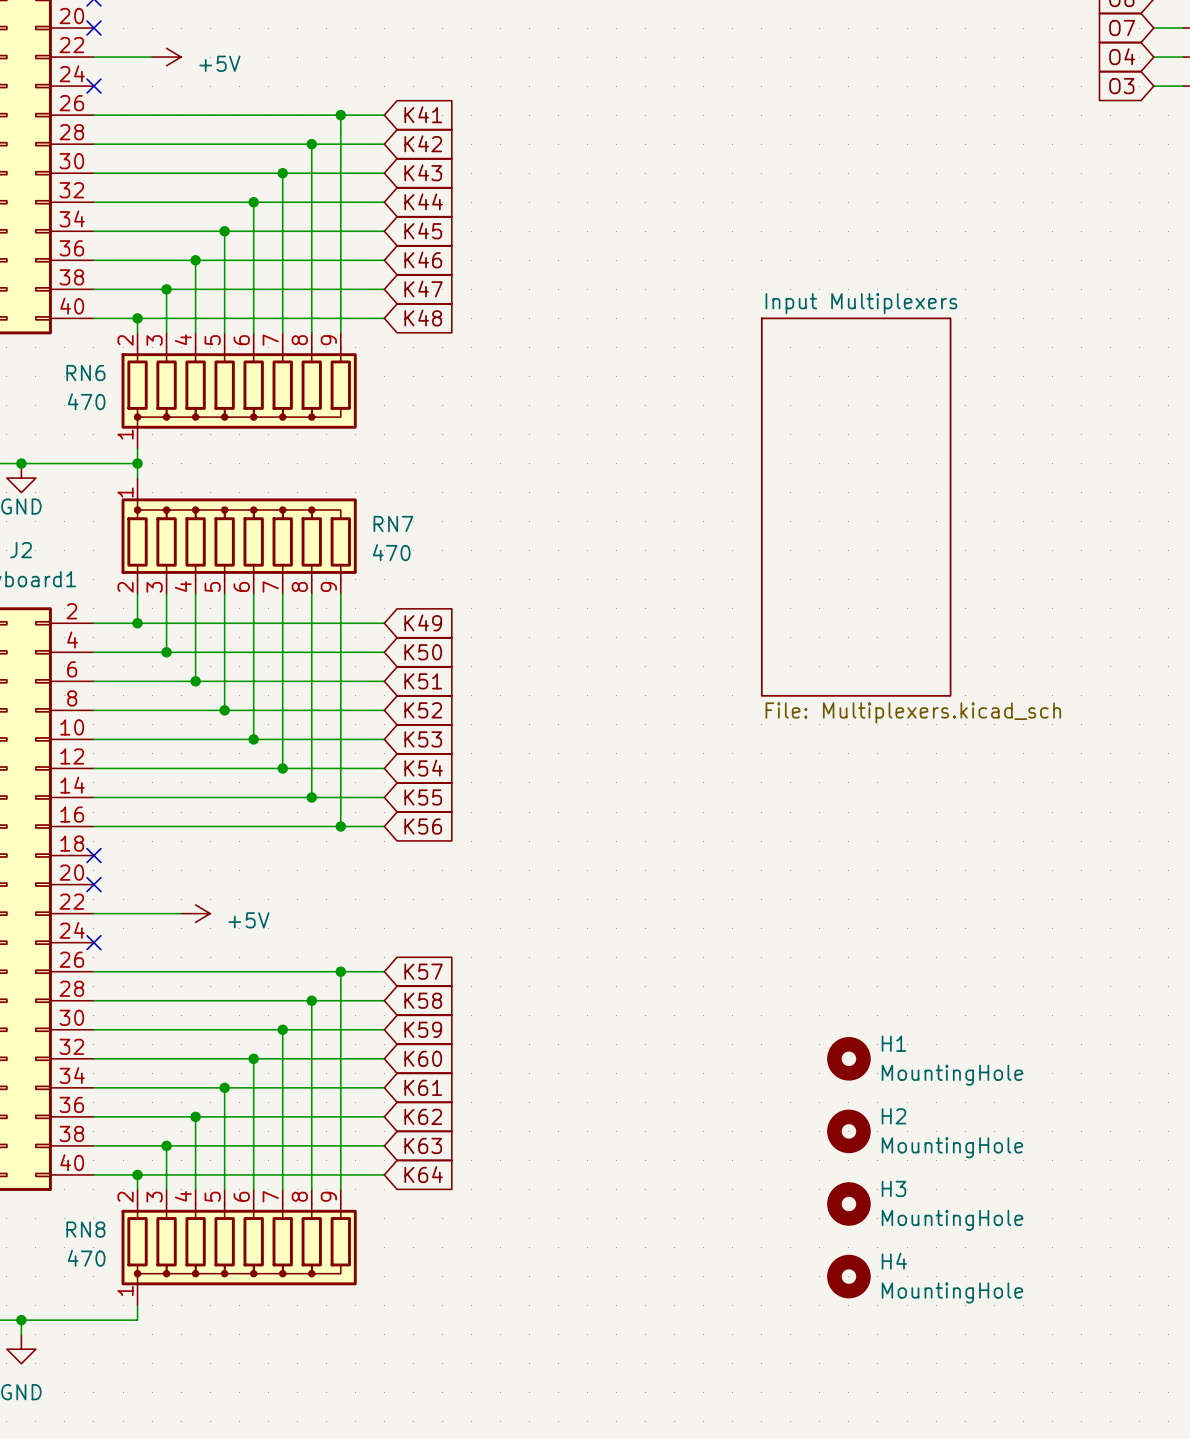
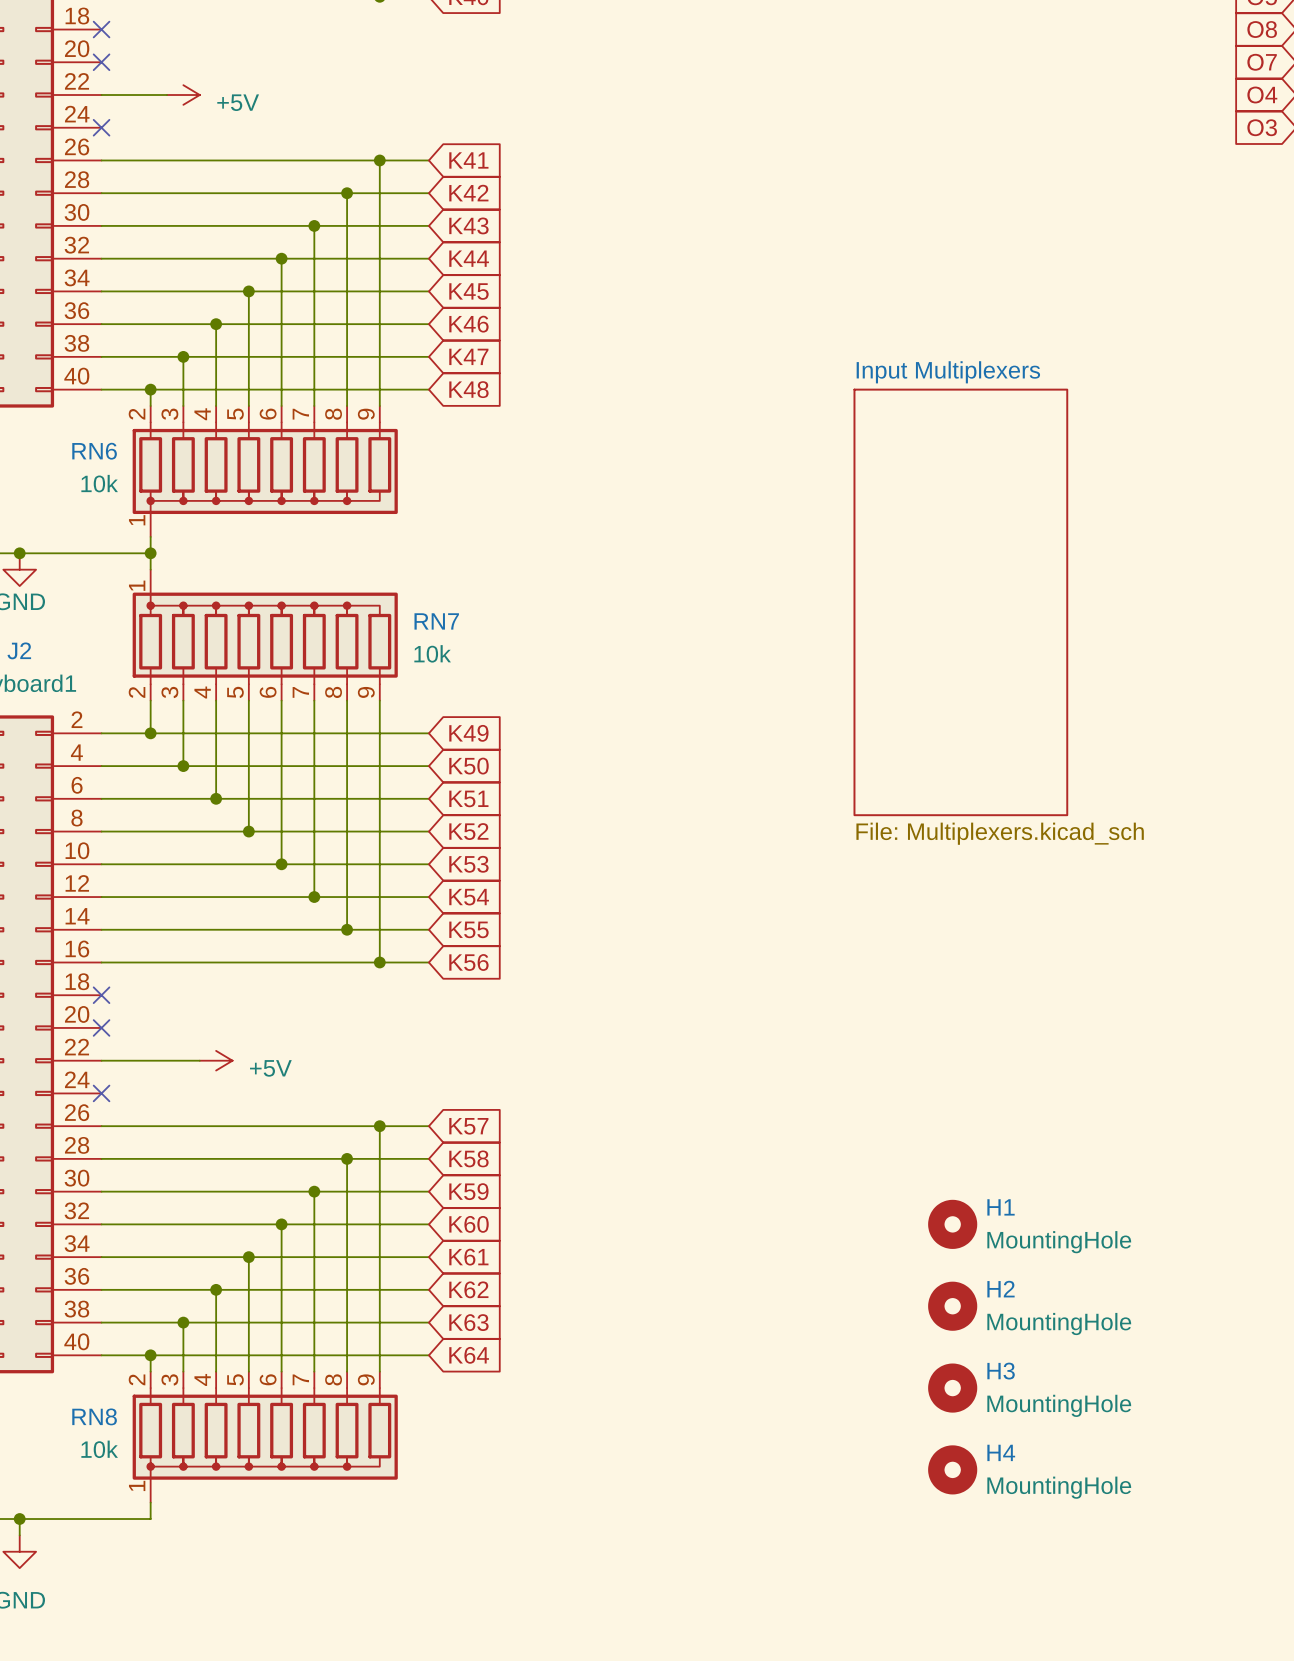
RN6 value: 470 (86, 401) -> 10k (99, 483)
RN7 value: 470 (391, 552) -> 10k (432, 653)
RN8 value: 470 (86, 1258) -> 10k (99, 1449)

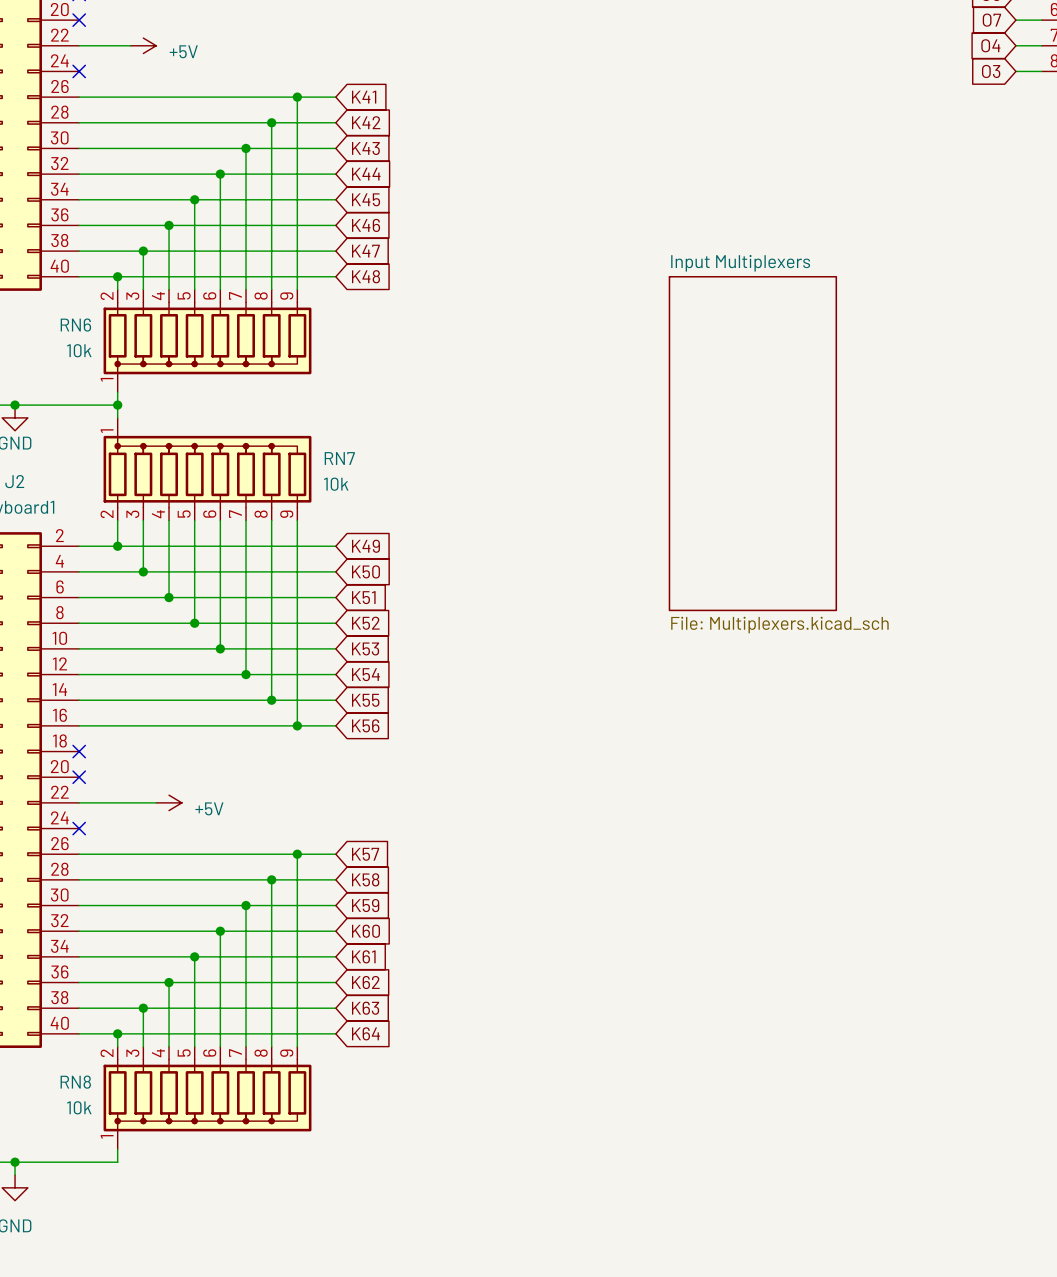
H1: MountingHole (952, 1224) -> none
H2: MountingHole (952, 1306) -> none
H3: MountingHole (952, 1388) -> none
H4: MountingHole (952, 1469) -> none

